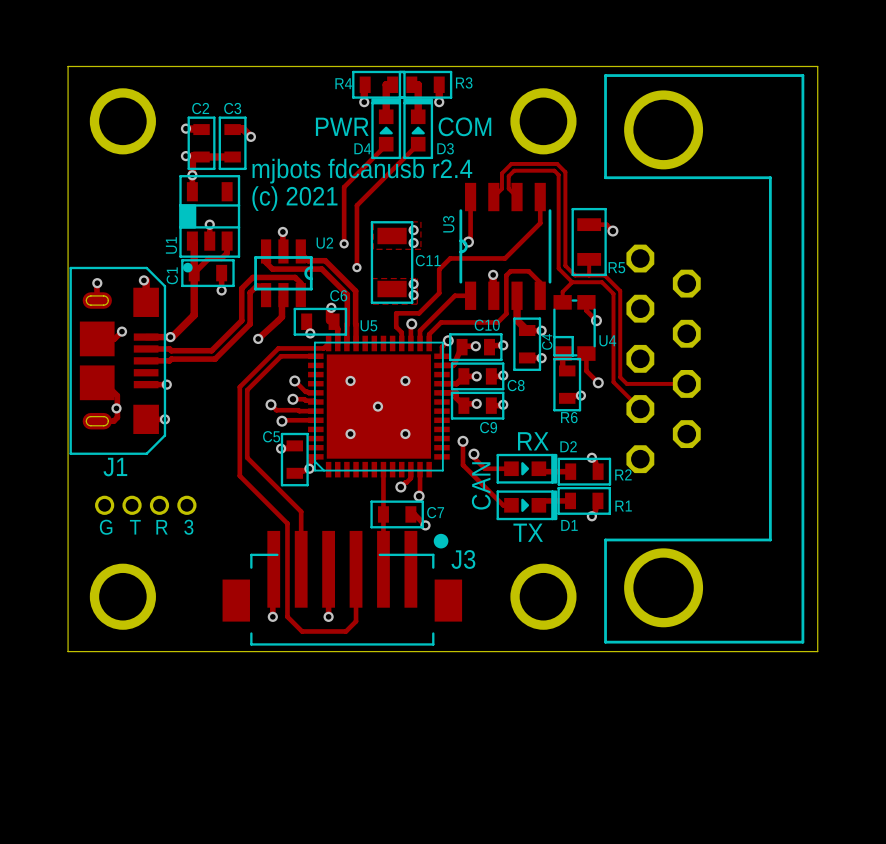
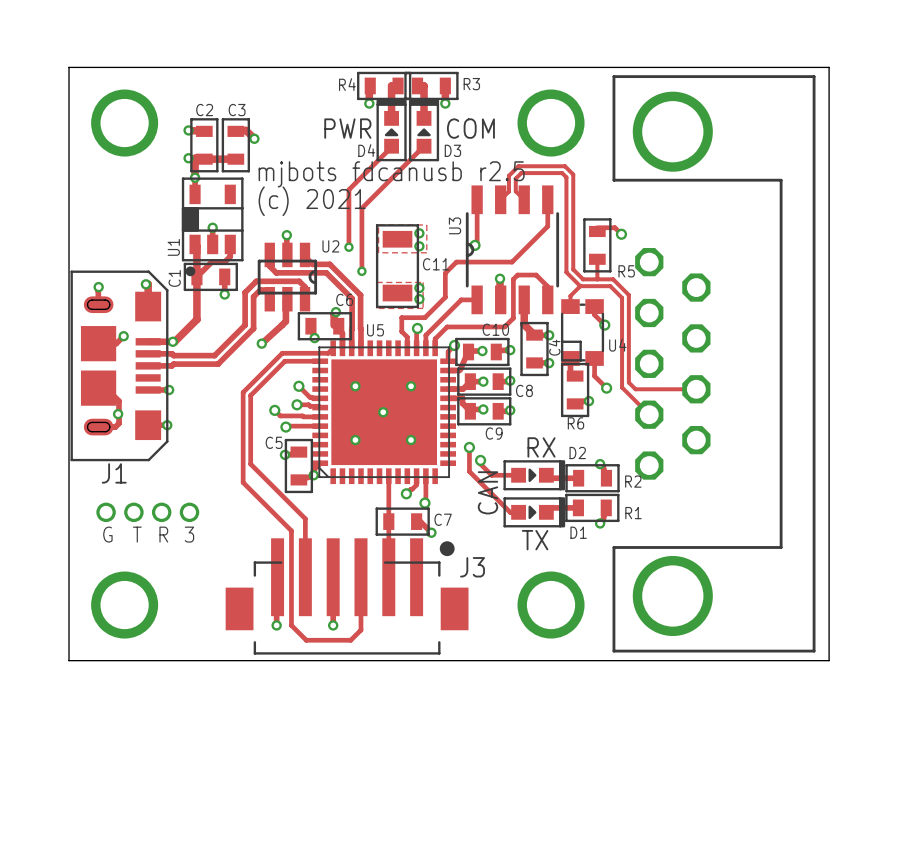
text: mjbots fdcanusb r2.4 (362, 171) -> mjbots fdcanusb r2.5 (391, 174)
R5 footprint: [571, 207, 607, 277] -> [583, 218, 612, 273]

